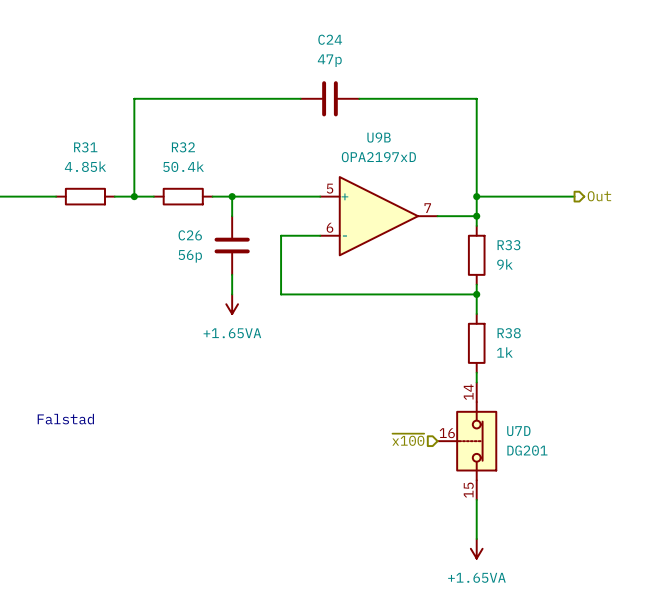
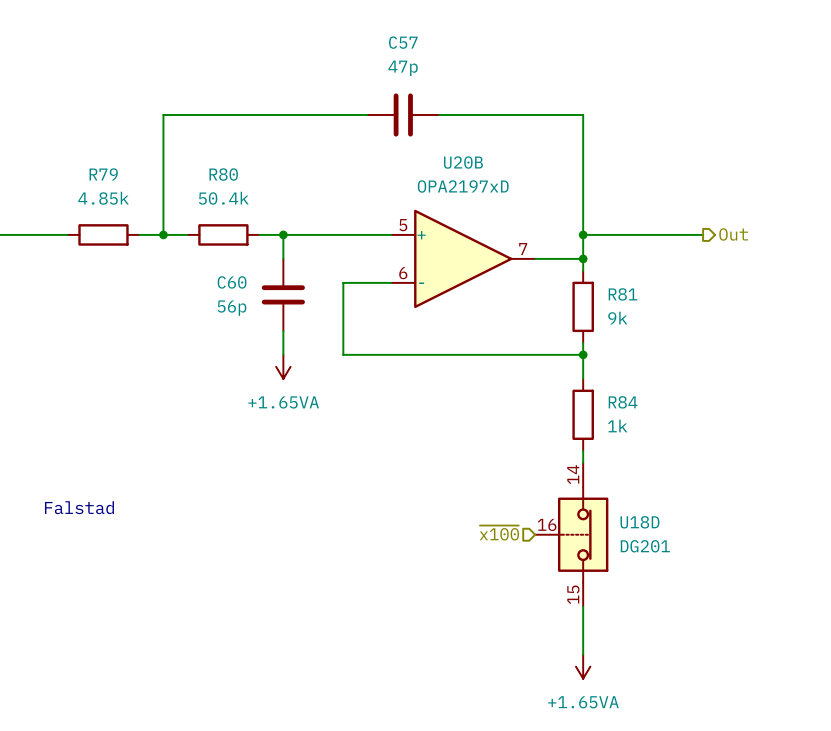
C24 name: C24 (330, 39) -> C57 (403, 42)
U9B name: U9B (379, 137) -> U20B (463, 162)
R31 name: R31 (85, 147) -> R79 (103, 174)
R32 name: R32 (183, 147) -> R80 (223, 174)
C26 name: C26 (190, 235) -> C60 (232, 282)
R33 name: R33 (508, 245) -> R81 (622, 294)
R38 name: R38 (509, 333) -> R84 (623, 402)
U7D name: U7D (518, 431) -> U18D (639, 522)

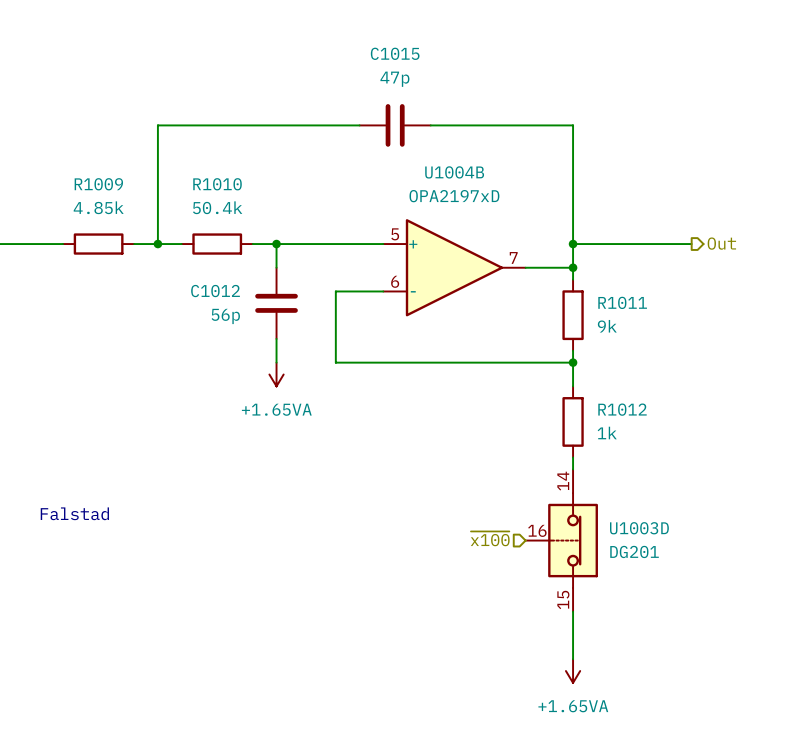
C57 name: C57 (403, 42) -> C1015 (395, 53)
U20B name: U20B (463, 162) -> U1004B (454, 172)
R79 name: R79 (103, 174) -> R1009 (98, 184)
R80 name: R80 (223, 174) -> R1010 (217, 184)
C60 name: C60 (232, 282) -> C1012 (215, 291)
R81 name: R81 (622, 294) -> R1011 (622, 302)
R84 name: R84 (623, 402) -> R1012 (622, 409)
U18D name: U18D (639, 522) -> U1003D (639, 528)

